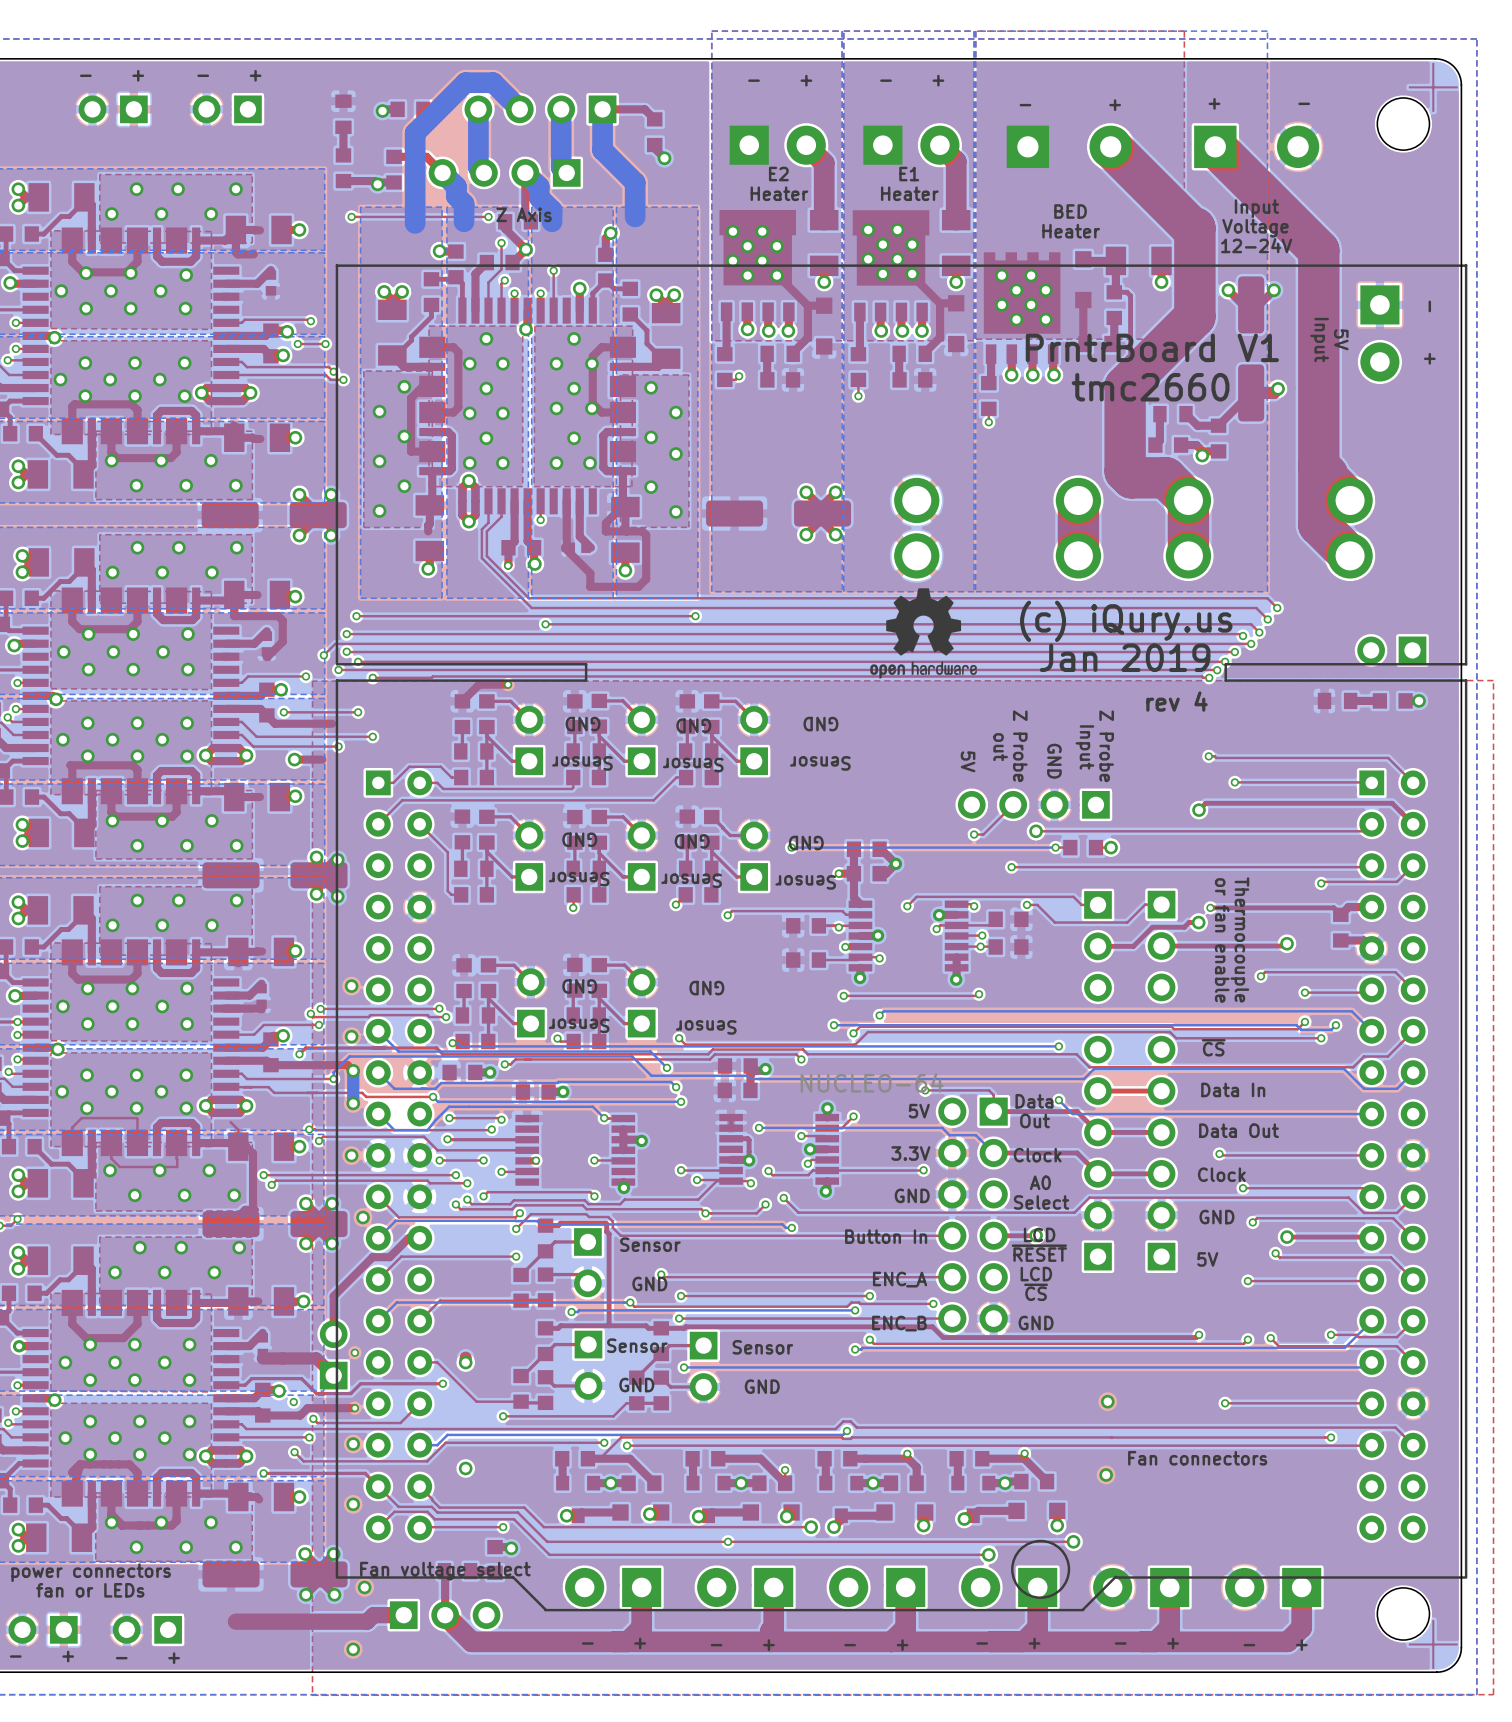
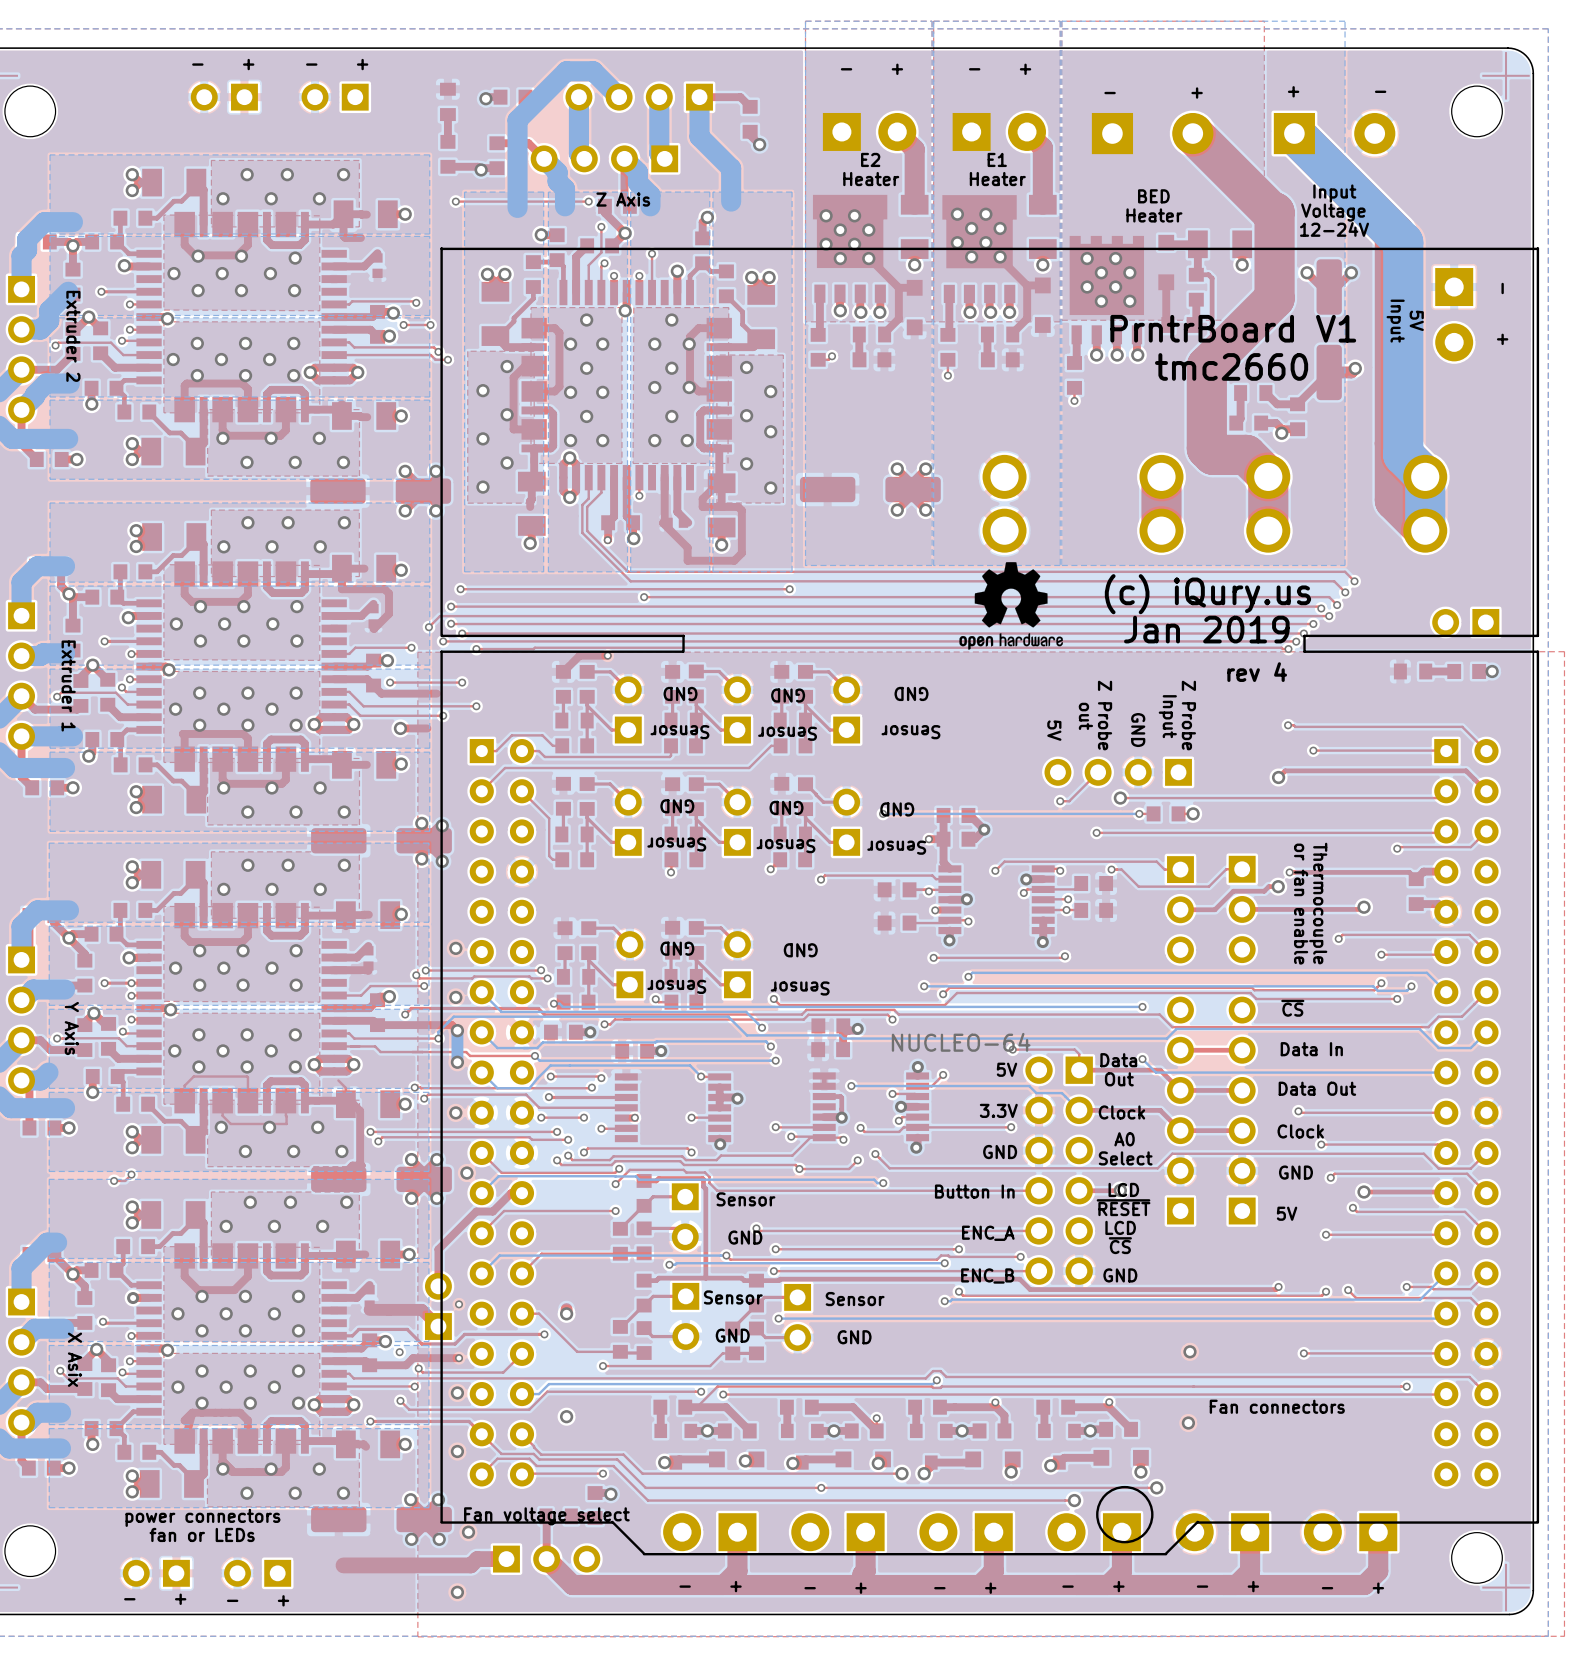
bottom track: none -> (1294, 133) (1403, 242) (1403, 454) (1425, 476) (1425, 530)

